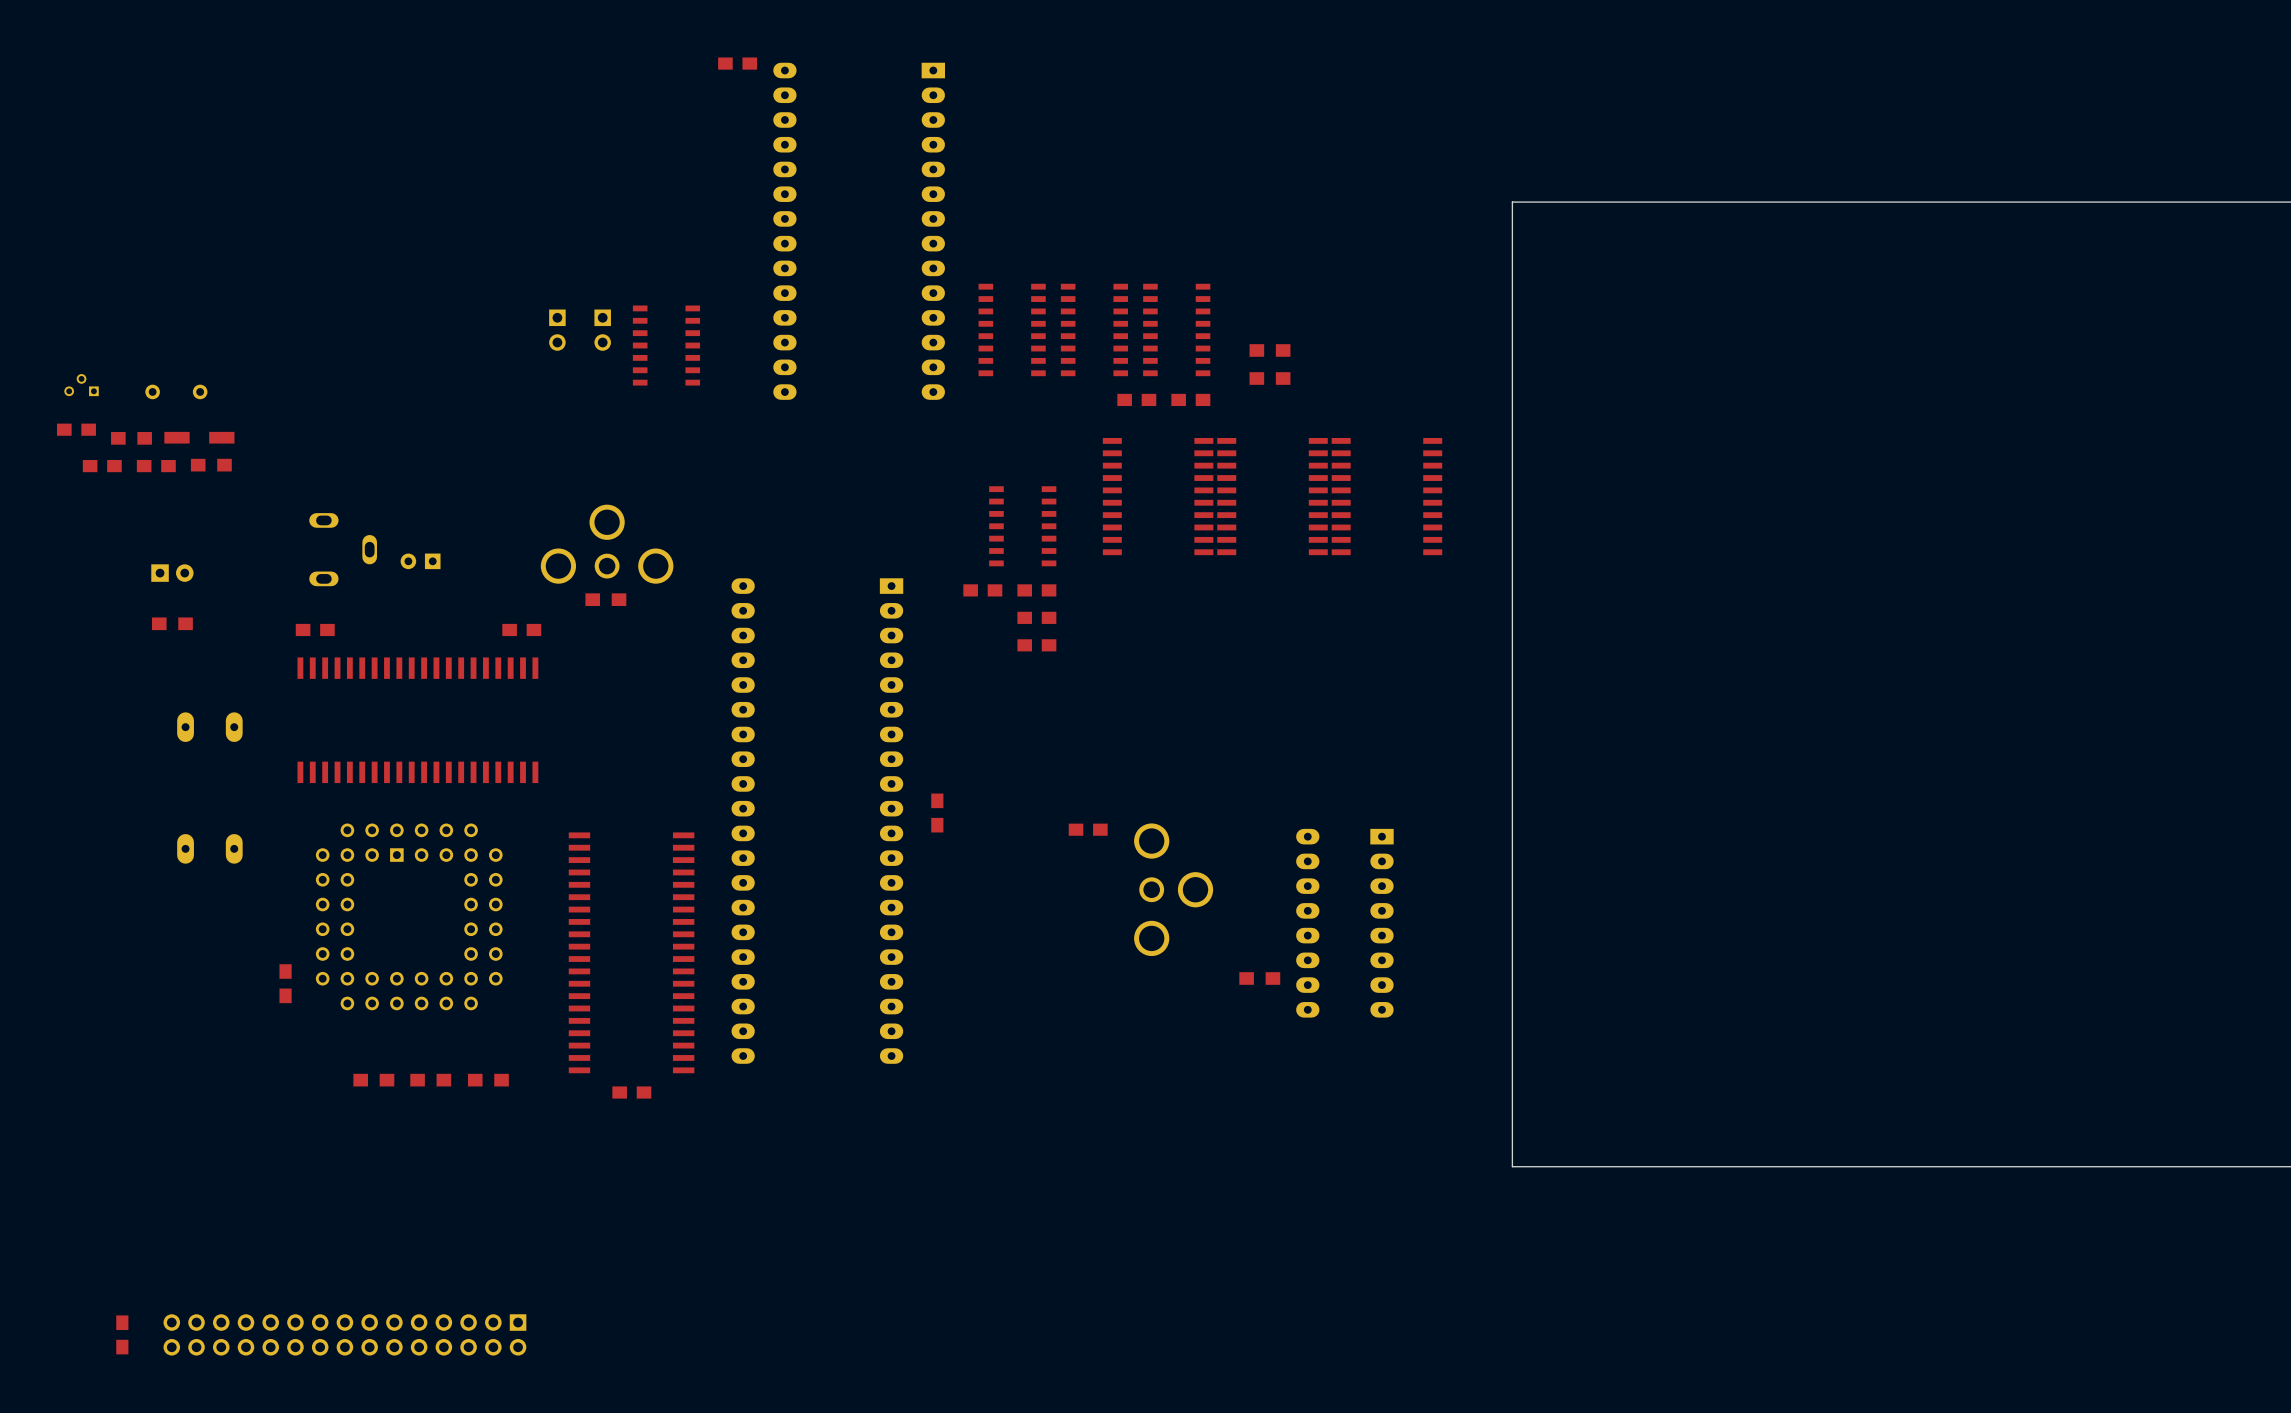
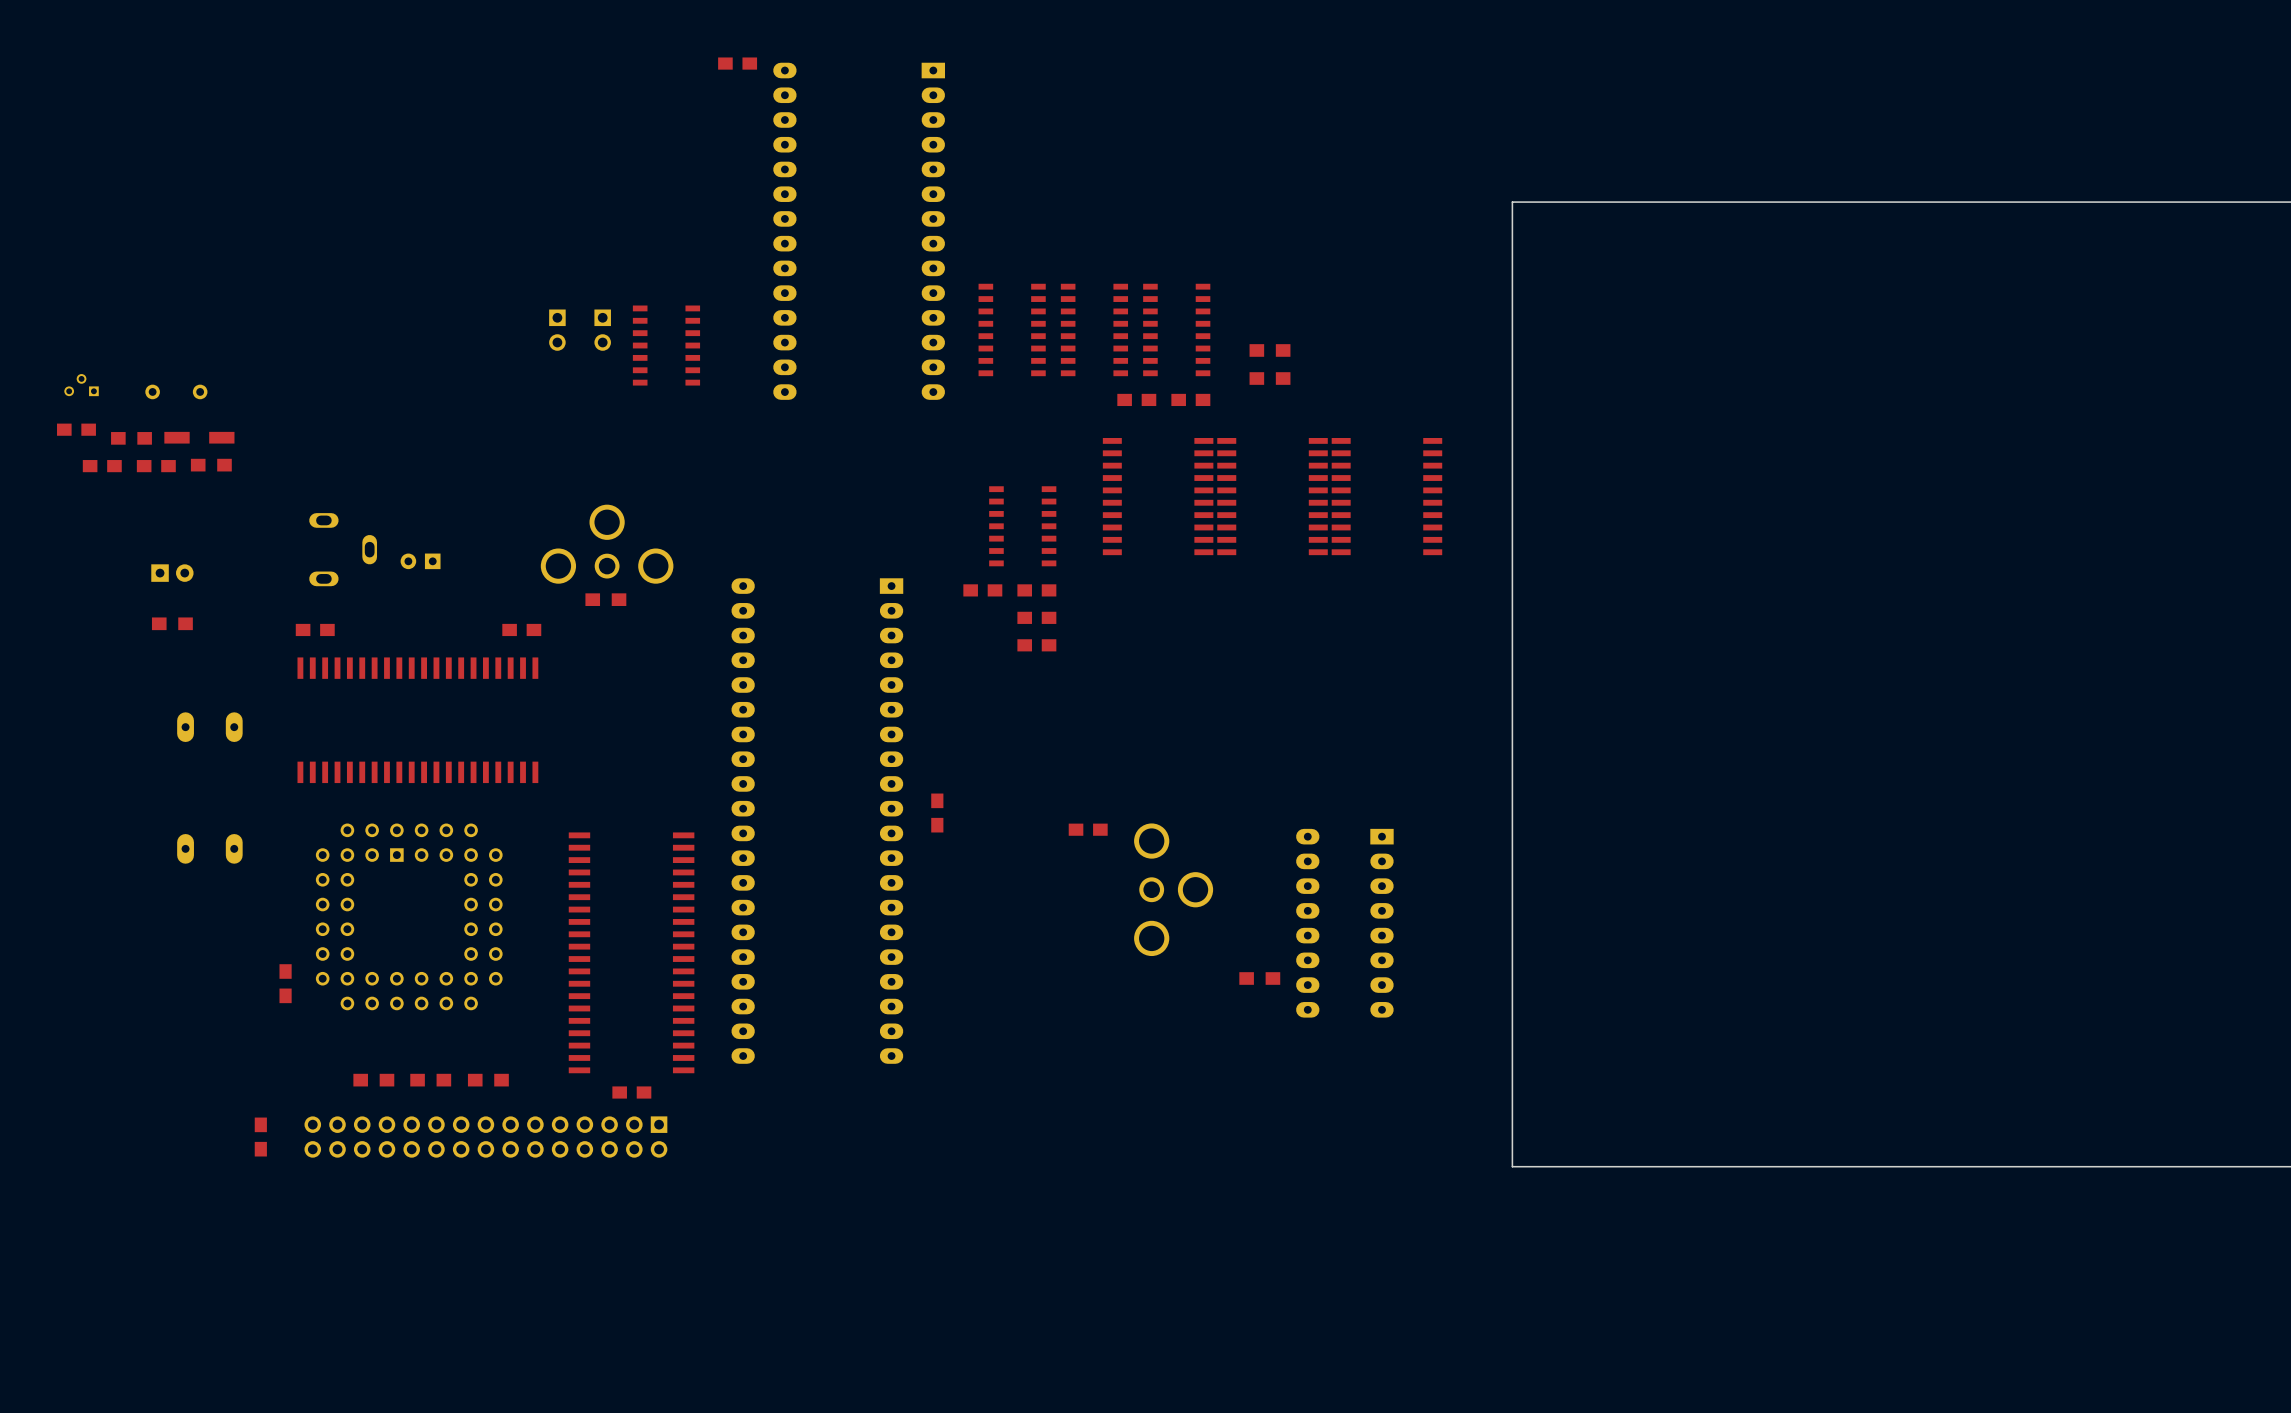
part position: (122, 1334) -> (260, 1137)
part position: (344, 1334) -> (485, 1137)

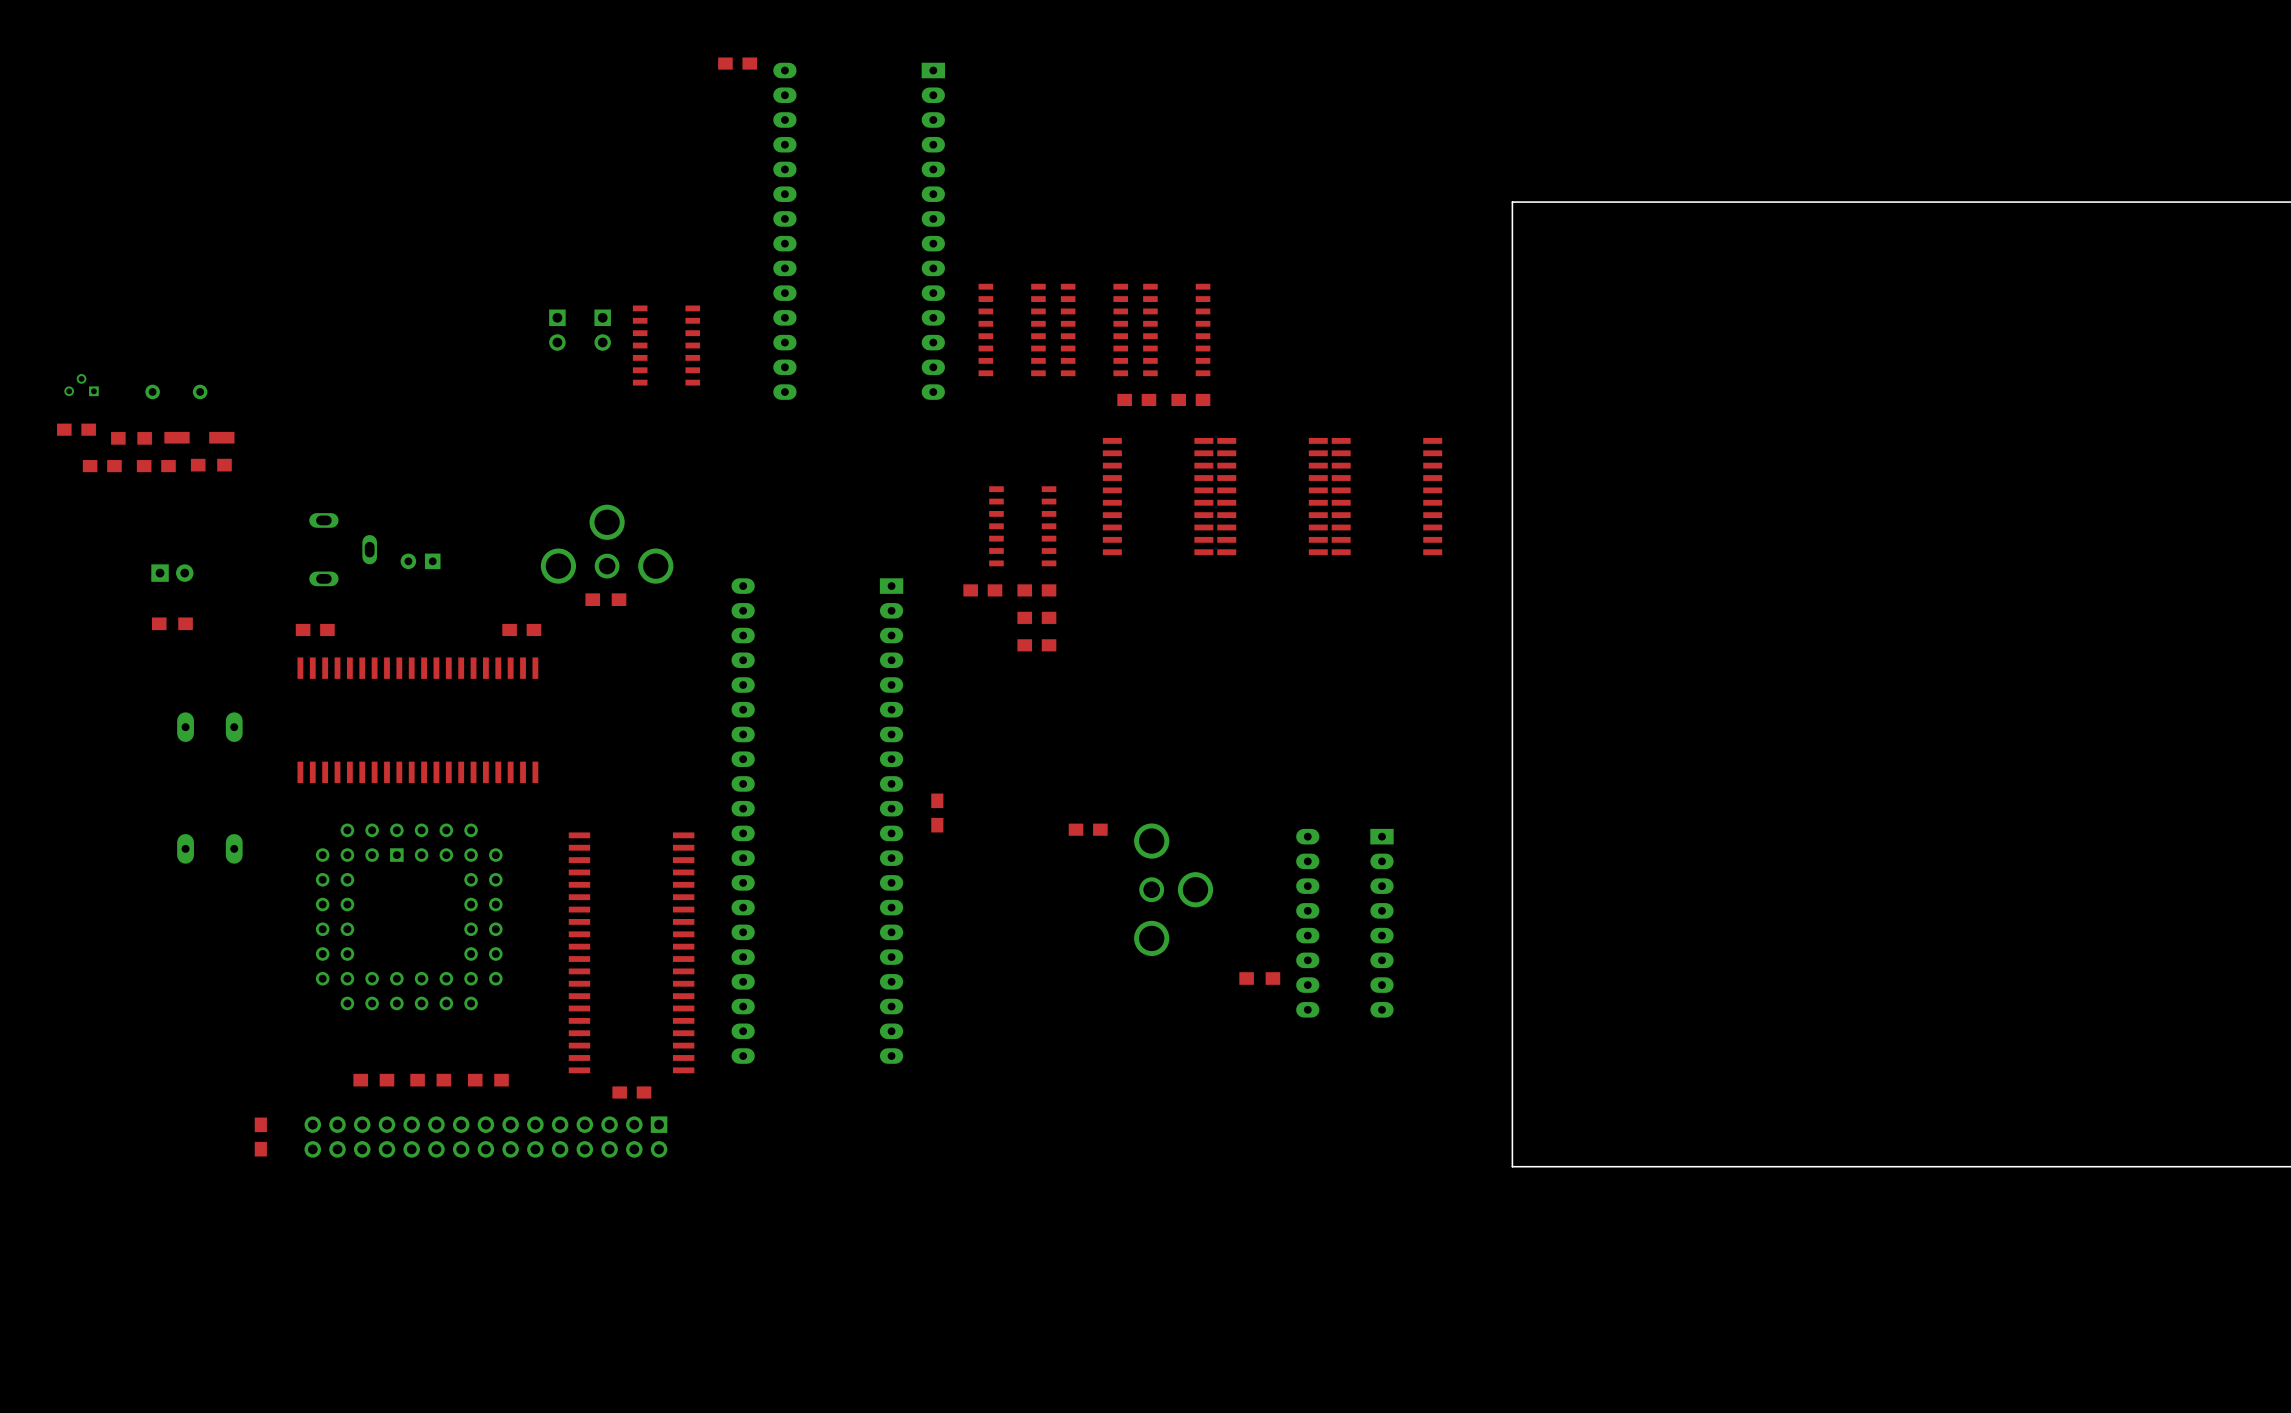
part: (1269, 350) -> none
part: (1269, 378) -> none
part: (285, 983) -> none

